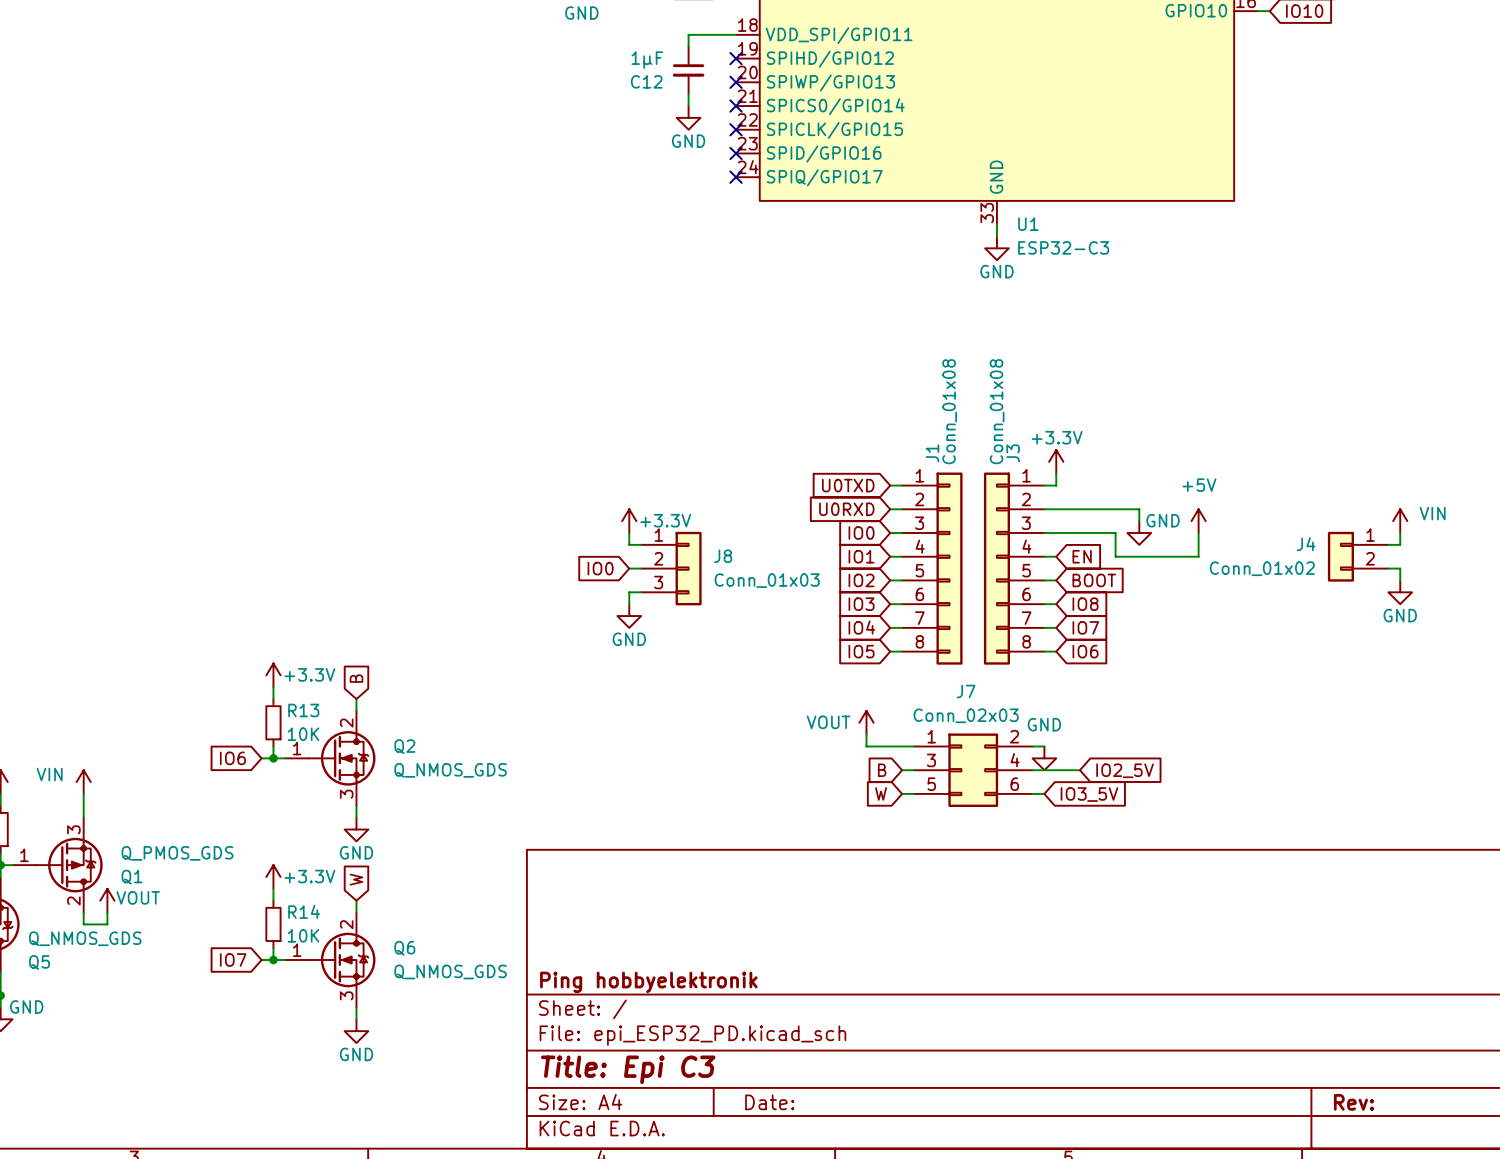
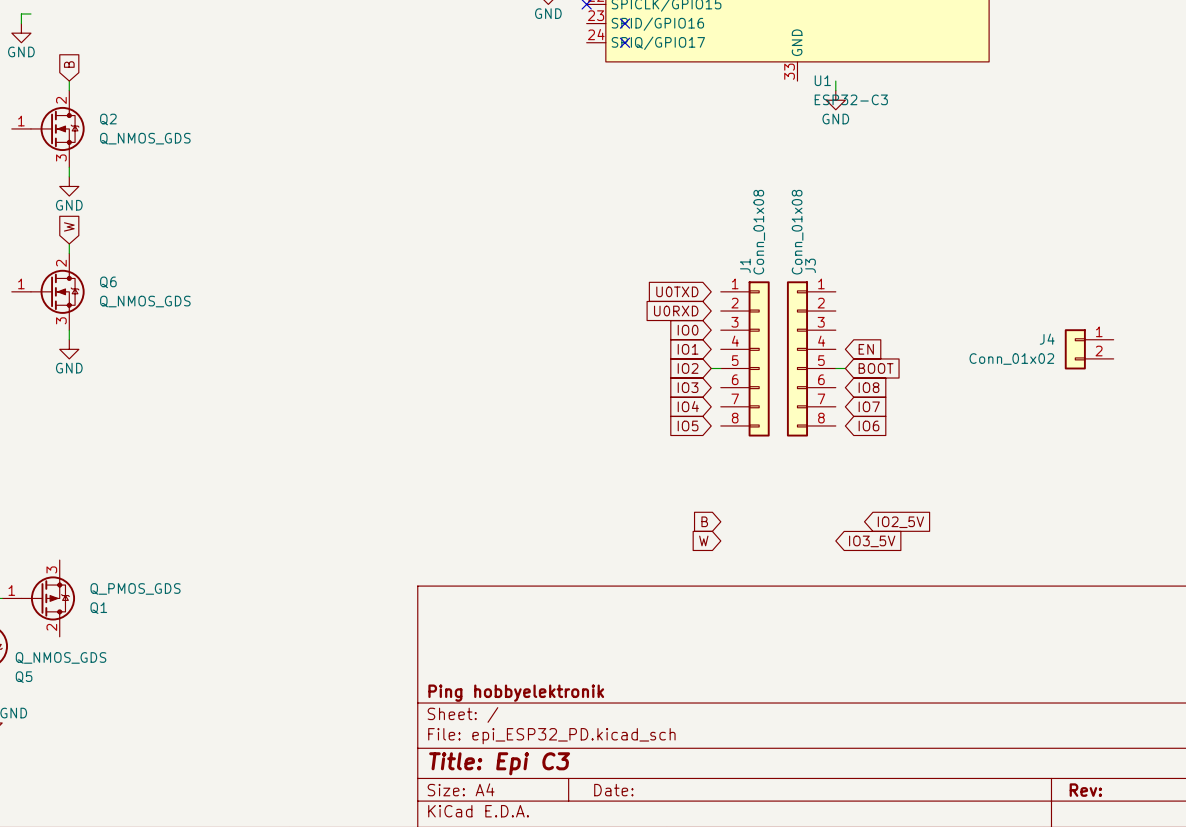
wire: none -> (30, 13) (21, 13) (21, 23)
no-connect mark: (736, 153) -> none
no-connect mark: none -> (625, 23)
power symbol: none -> GND (21, 33)
no-connect mark: (736, 177) -> none
no-connect mark: none -> (625, 42)
global label: none -> B (69, 64)
wire: none -> (69, 81) (69, 90)
wire: (996, 224) (996, 236) -> (835, 81) (835, 90)
power symbol position: GND (996, 248) -> GND (835, 100)
wire: none -> (69, 167) (69, 176)
power symbol: none -> GND (69, 186)
global label: none -> W (69, 226)
wire: none -> (69, 243) (69, 253)
power symbol: +3.3V (1056, 461) -> none
wire: (1056, 473) (1056, 485) (1044, 485) -> none
wire: (890, 485) (902, 485) -> none
wire: (890, 509) (902, 509) -> none
wire: (1044, 509) (1139, 509) (1139, 521) -> none
power symbol: +3.3V (629, 521) -> none
power symbol: +5V (1198, 521) -> none
power symbol: VIN (1400, 521) -> none
wire: none -> (69, 330) (69, 339)
wire: (629, 533) (629, 544) (641, 544) -> none
wire: (890, 533) (902, 533) -> none
wire: (1044, 533) (1115, 533) (1115, 556) (1198, 556) (1198, 533) -> none
power symbol: GND (1139, 533) -> none
wire: (1400, 533) (1400, 544) (1388, 544) -> none
power symbol: none -> GND (69, 349)
wire: (890, 556) (902, 556) -> none
wire: (1044, 556) (1056, 556) -> none
global label: IO0 (600, 568) -> none
wire: (629, 568) (641, 568) -> none
J8: Conn_01x03 (671, 568) -> none
wire: (1388, 568) (1400, 568) (1400, 580) -> none
wire: (641, 592) (629, 592) (629, 604) -> none
power symbol: GND (1400, 592) -> none
wire: (890, 604) (902, 604) -> none
wire: (1044, 604) (1056, 604) -> none
power symbol: GND (629, 616) -> none
wire: (890, 627) (902, 627) -> none
wire: (1044, 627) (1056, 627) -> none
wire: (890, 651) (902, 651) -> none
wire: (1044, 651) (1056, 651) -> none
power symbol: +3.3V (273, 675) -> none
global label: B (356, 678) -> none
wire: (273, 687) (273, 699) -> none
wire: (356, 699) (356, 710) -> none
R13: 10K (273, 722) -> none
power symbol: VOUT (866, 722) -> none
wire: (866, 734) (866, 746) (913, 746) -> none
wire: (273, 746) (273, 758) -> none
wire: (1032, 746) (1044, 746) -> none
global label: IO6 (232, 758) -> none
wire: (261, 758) (285, 758) -> none
junction: (273, 758) -> none
Q2 position: (330, 758) -> (48, 128)
power symbol: GND (1044, 758) -> none
wire: (902, 770) (913, 770) -> none
J7: Conn_02x03 (973, 770) -> none
wire: (1032, 770) (1079, 770) -> none
power symbol: VIN (83, 782) -> none
wire: (83, 793) (83, 817) -> none
wire: (902, 793) (913, 793) -> none
wire: (1032, 793) (1044, 793) -> none
wire: (356, 805) (356, 817) -> none
power symbol: GND (356, 829) -> none
power symbol: +3.3V (273, 876) -> none
global label: W (356, 879) -> none
wire: (273, 888) (273, 900) -> none
power symbol: VOUT (107, 900) -> none
wire: (356, 900) (356, 912) -> none
wire: (83, 912) (83, 924) (107, 924) (107, 912) -> none
R14: 10K (273, 924) -> none
wire: (273, 948) (273, 960) -> none
global label: IO7 (233, 960) -> none
wire: (261, 960) (285, 960) -> none
junction: (273, 960) -> none
Q6 position: (330, 960) -> (48, 291)
wire: (356, 1007) (356, 1019) -> none
power symbol: GND (356, 1031) -> none

